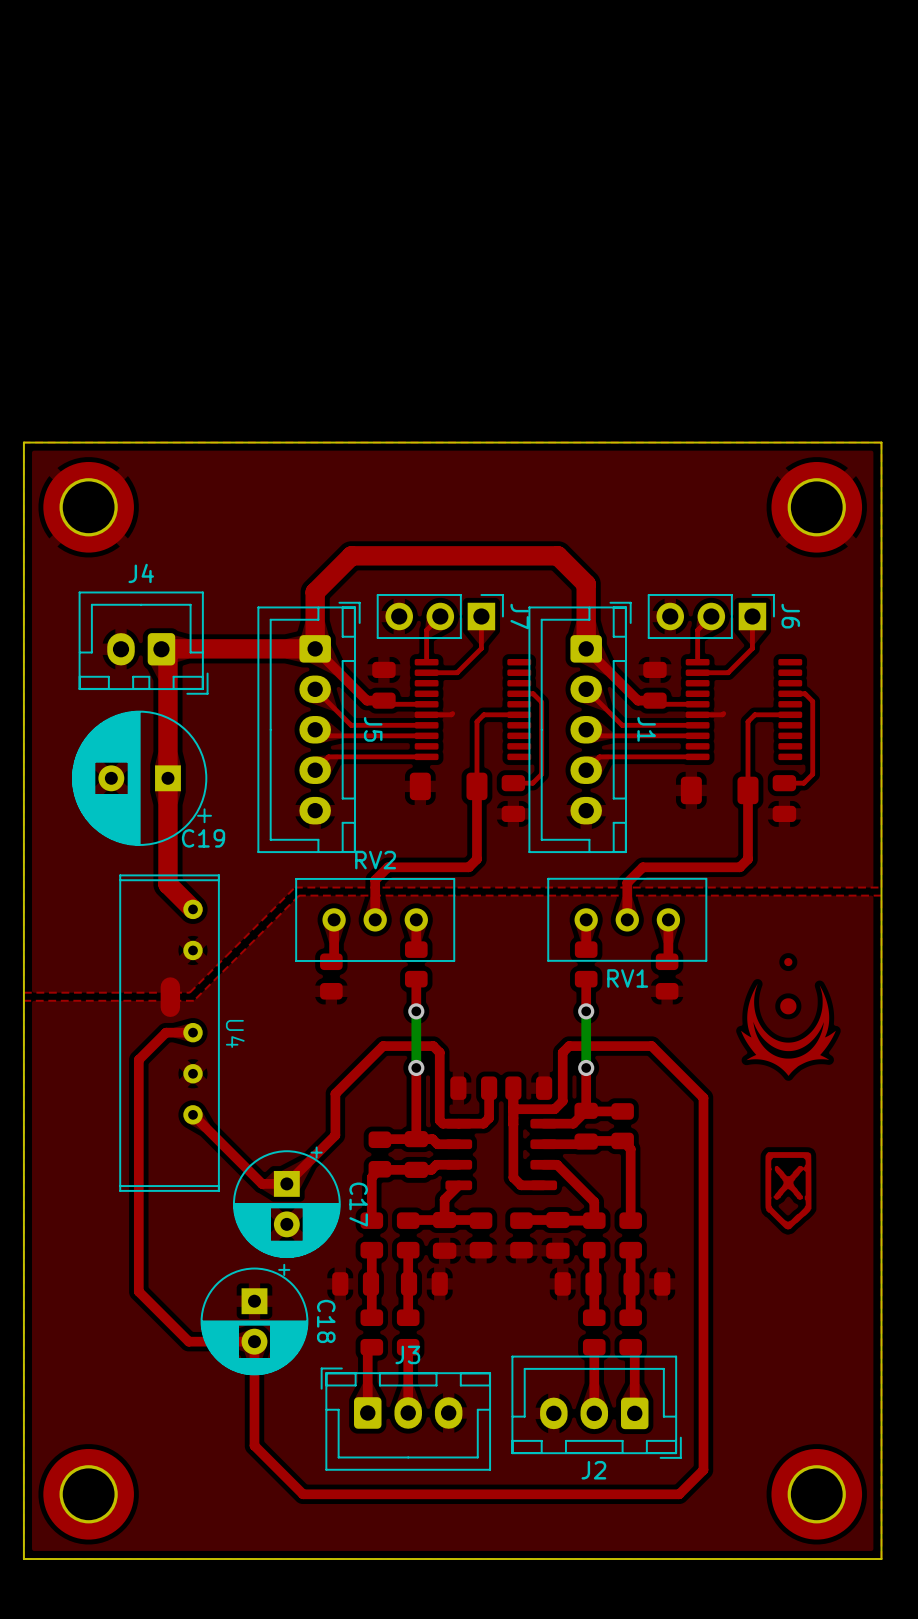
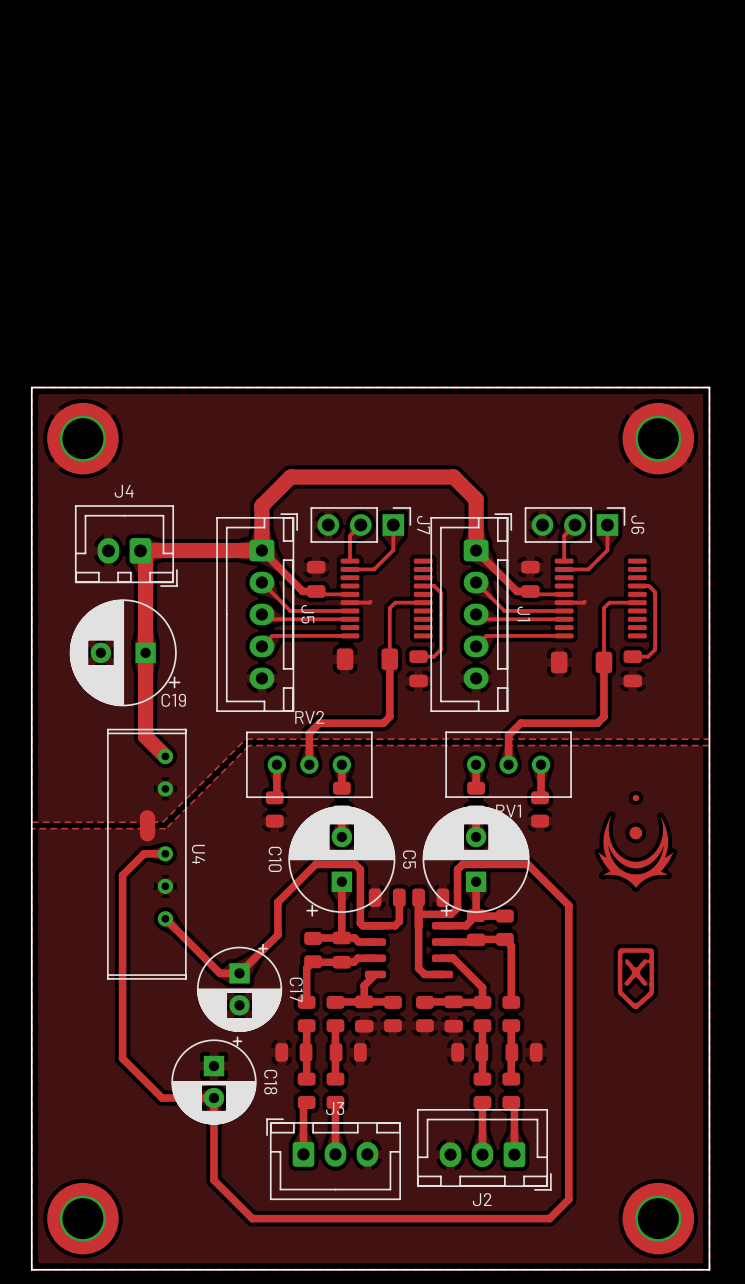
bottom track: (416, 1011) (416, 1067) -> none
via: (416, 1011) -> none
bottom track: (586, 1011) (586, 1067) -> none
via: (586, 1011) -> none
C10: none -> (341, 861)
C5: none -> (476, 861)
via: (416, 1067) -> none
via: (586, 1067) -> none

